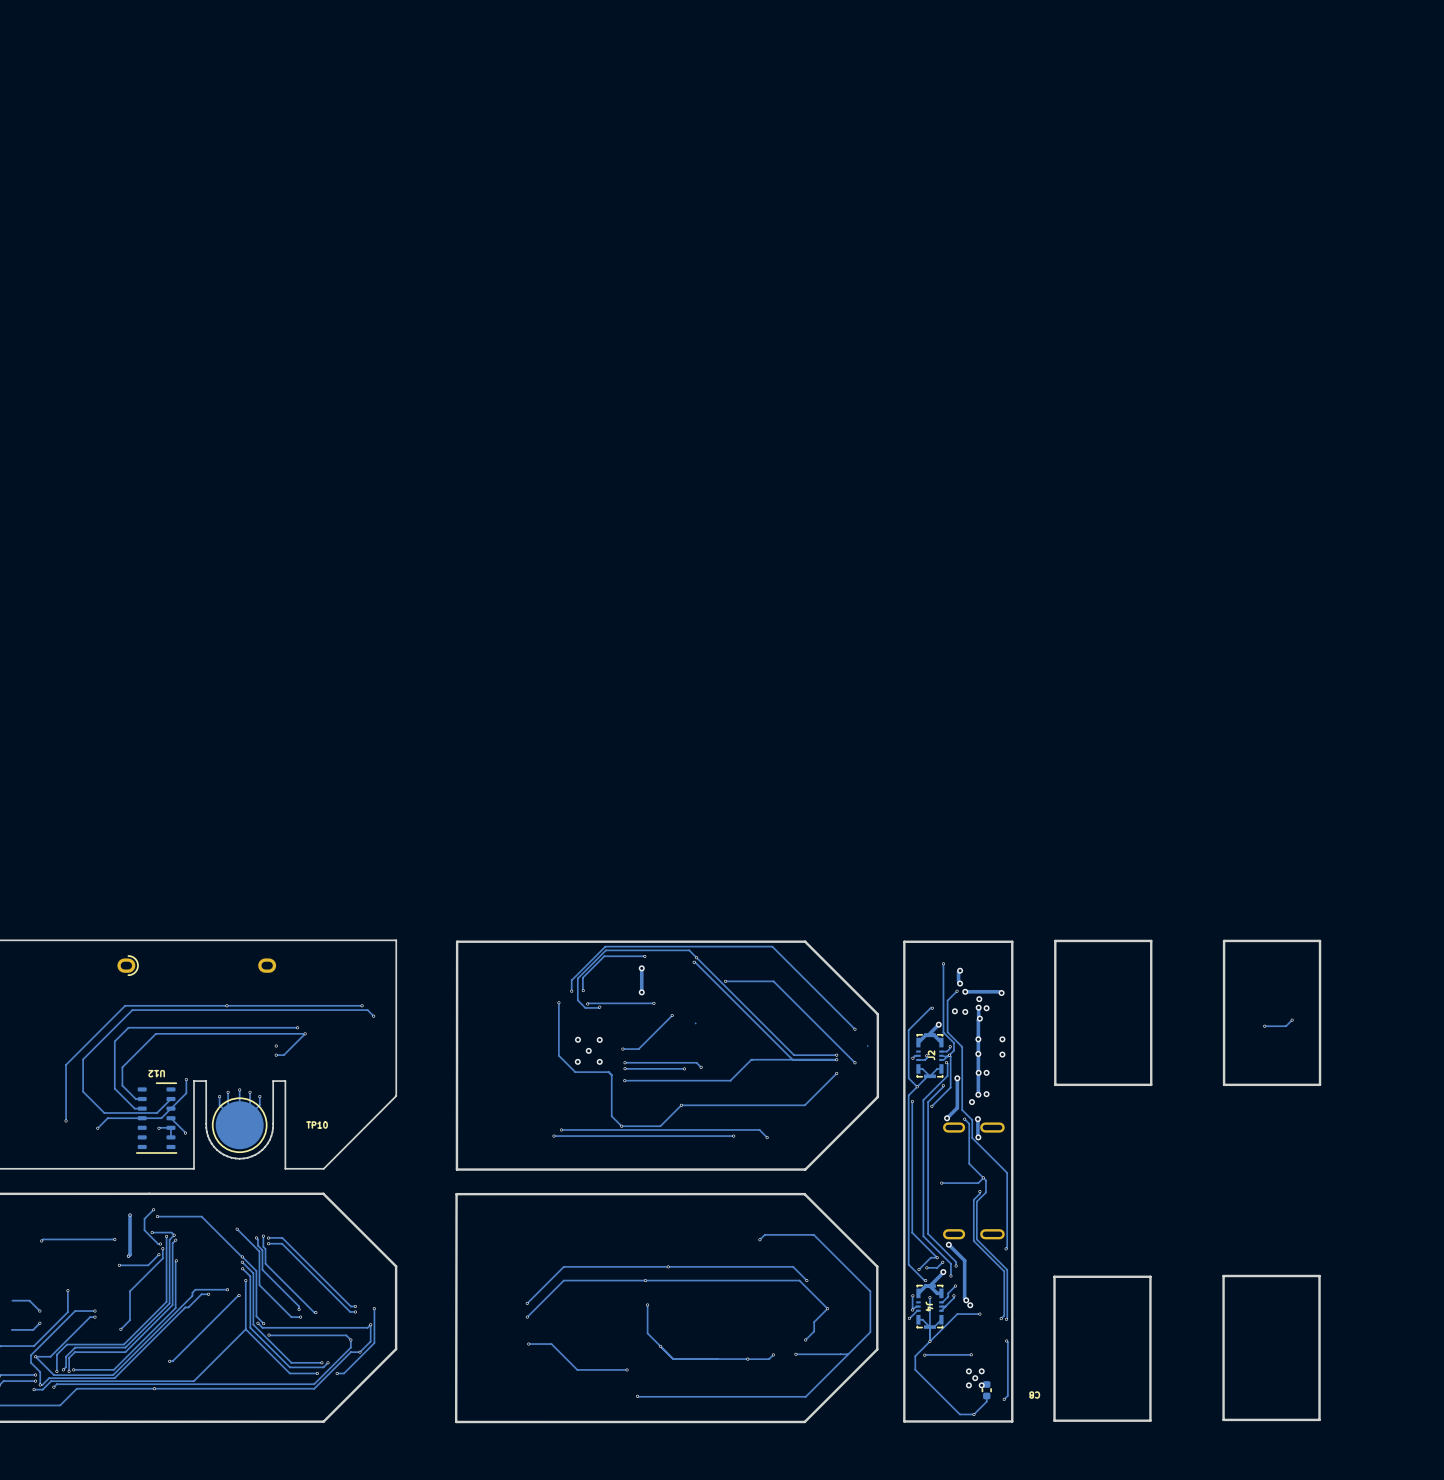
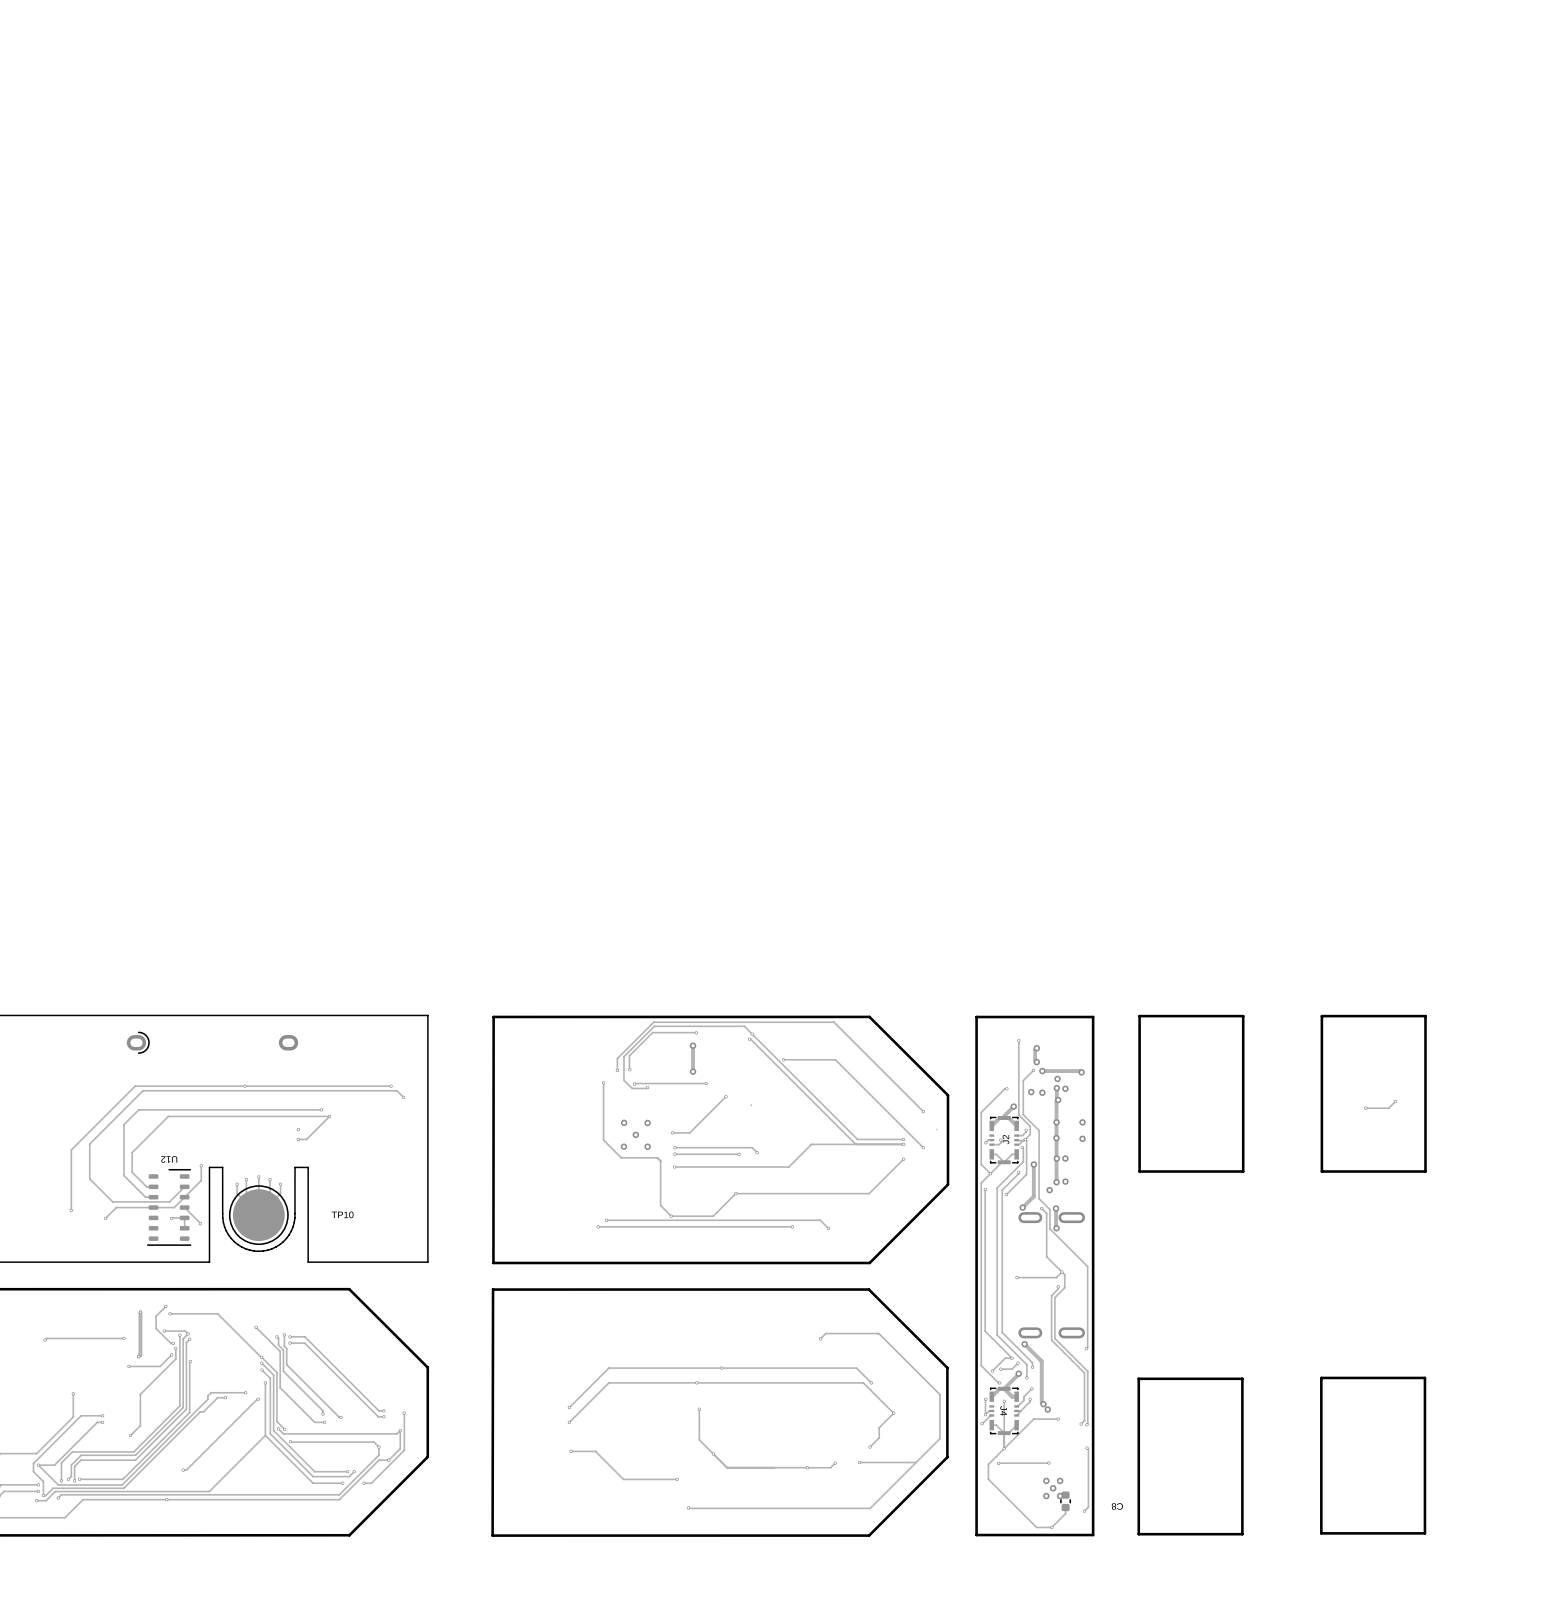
board edge: (396, 1095) (323, 1168) -> (427, 1183) (427, 1262) (349, 1262)
track: (12, 1300) (29, 1300) (39, 1311) -> none
via: (39, 1311) -> none
track: (39, 1323) (33, 1329) (11, 1329) -> none
via: (39, 1323) -> none

